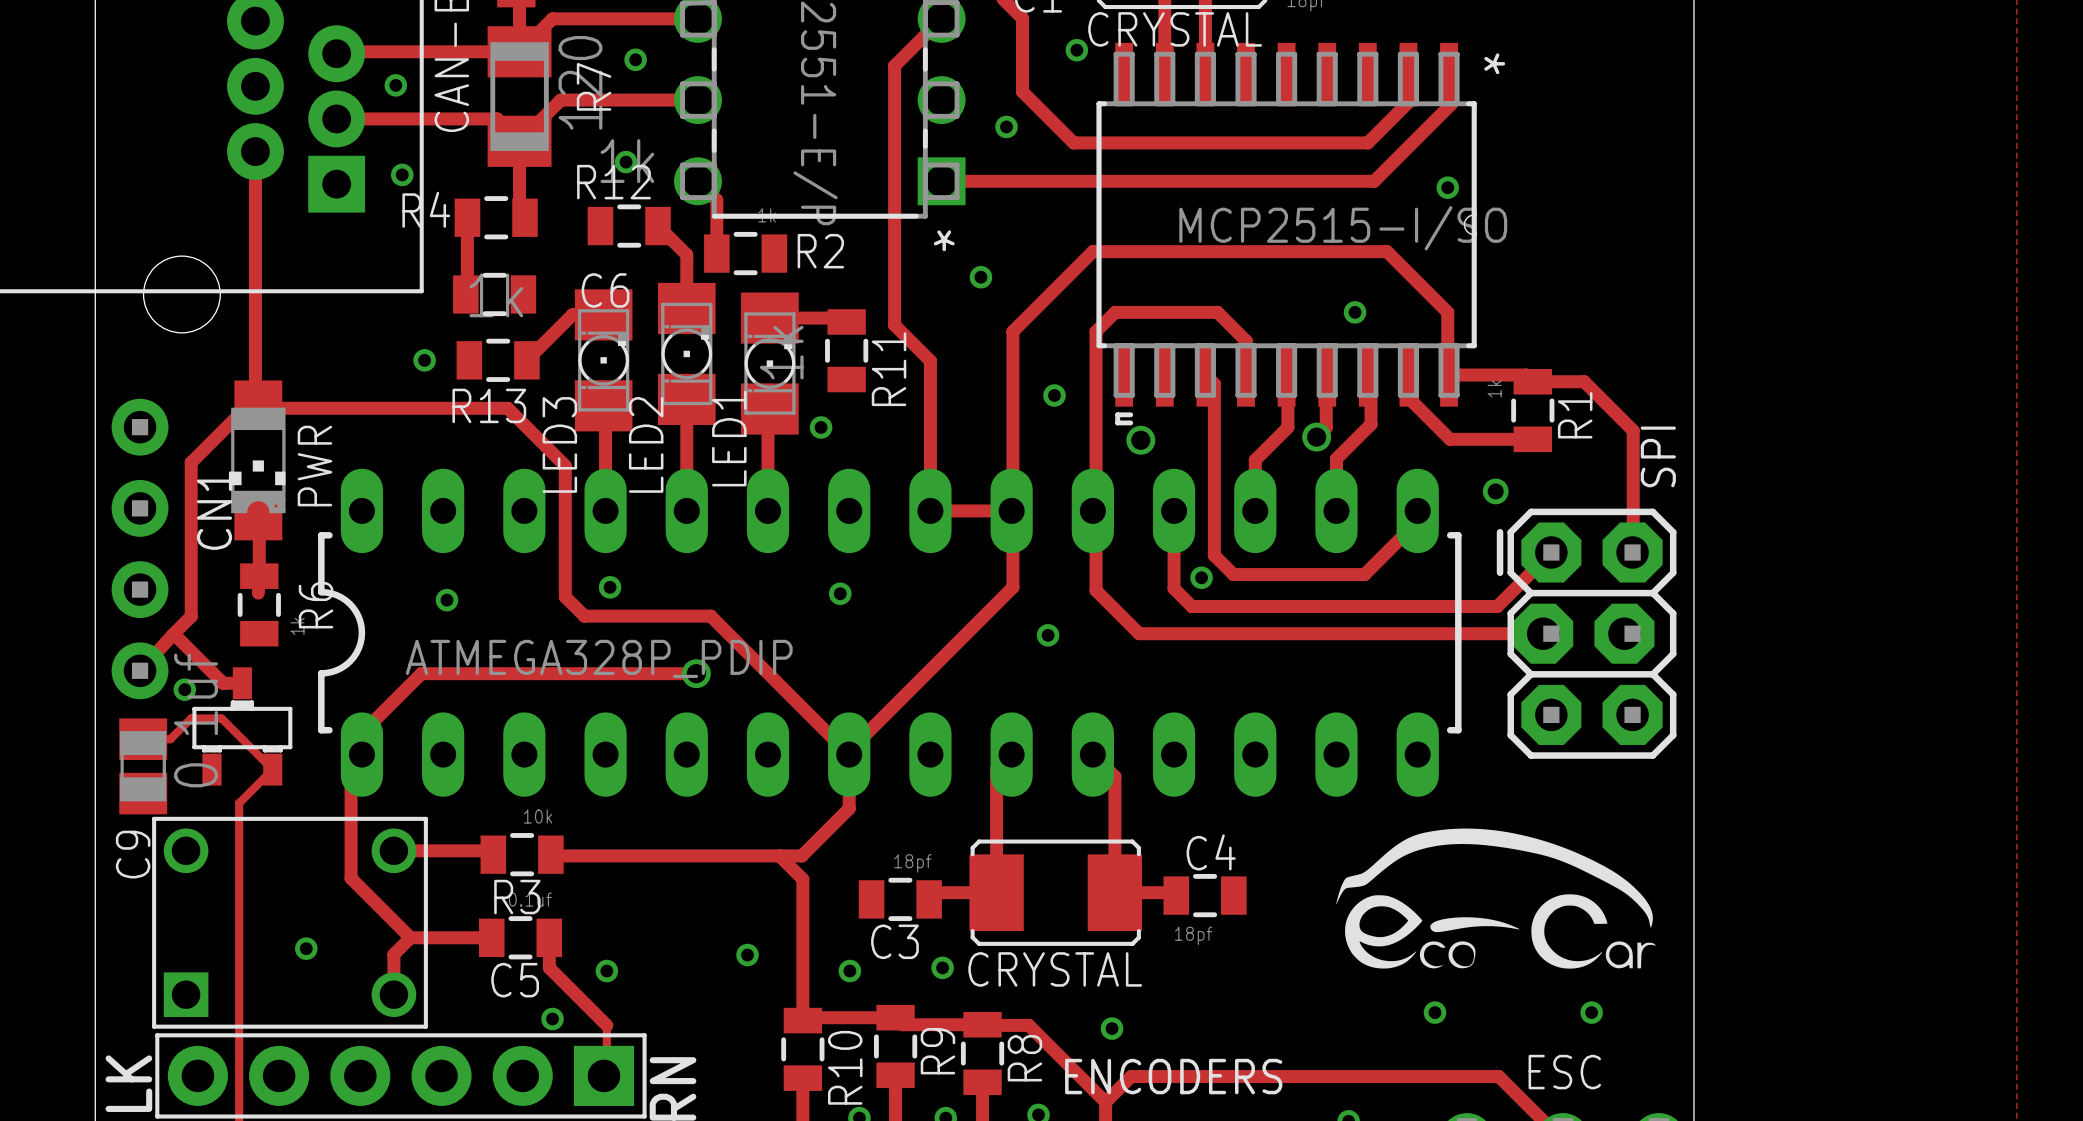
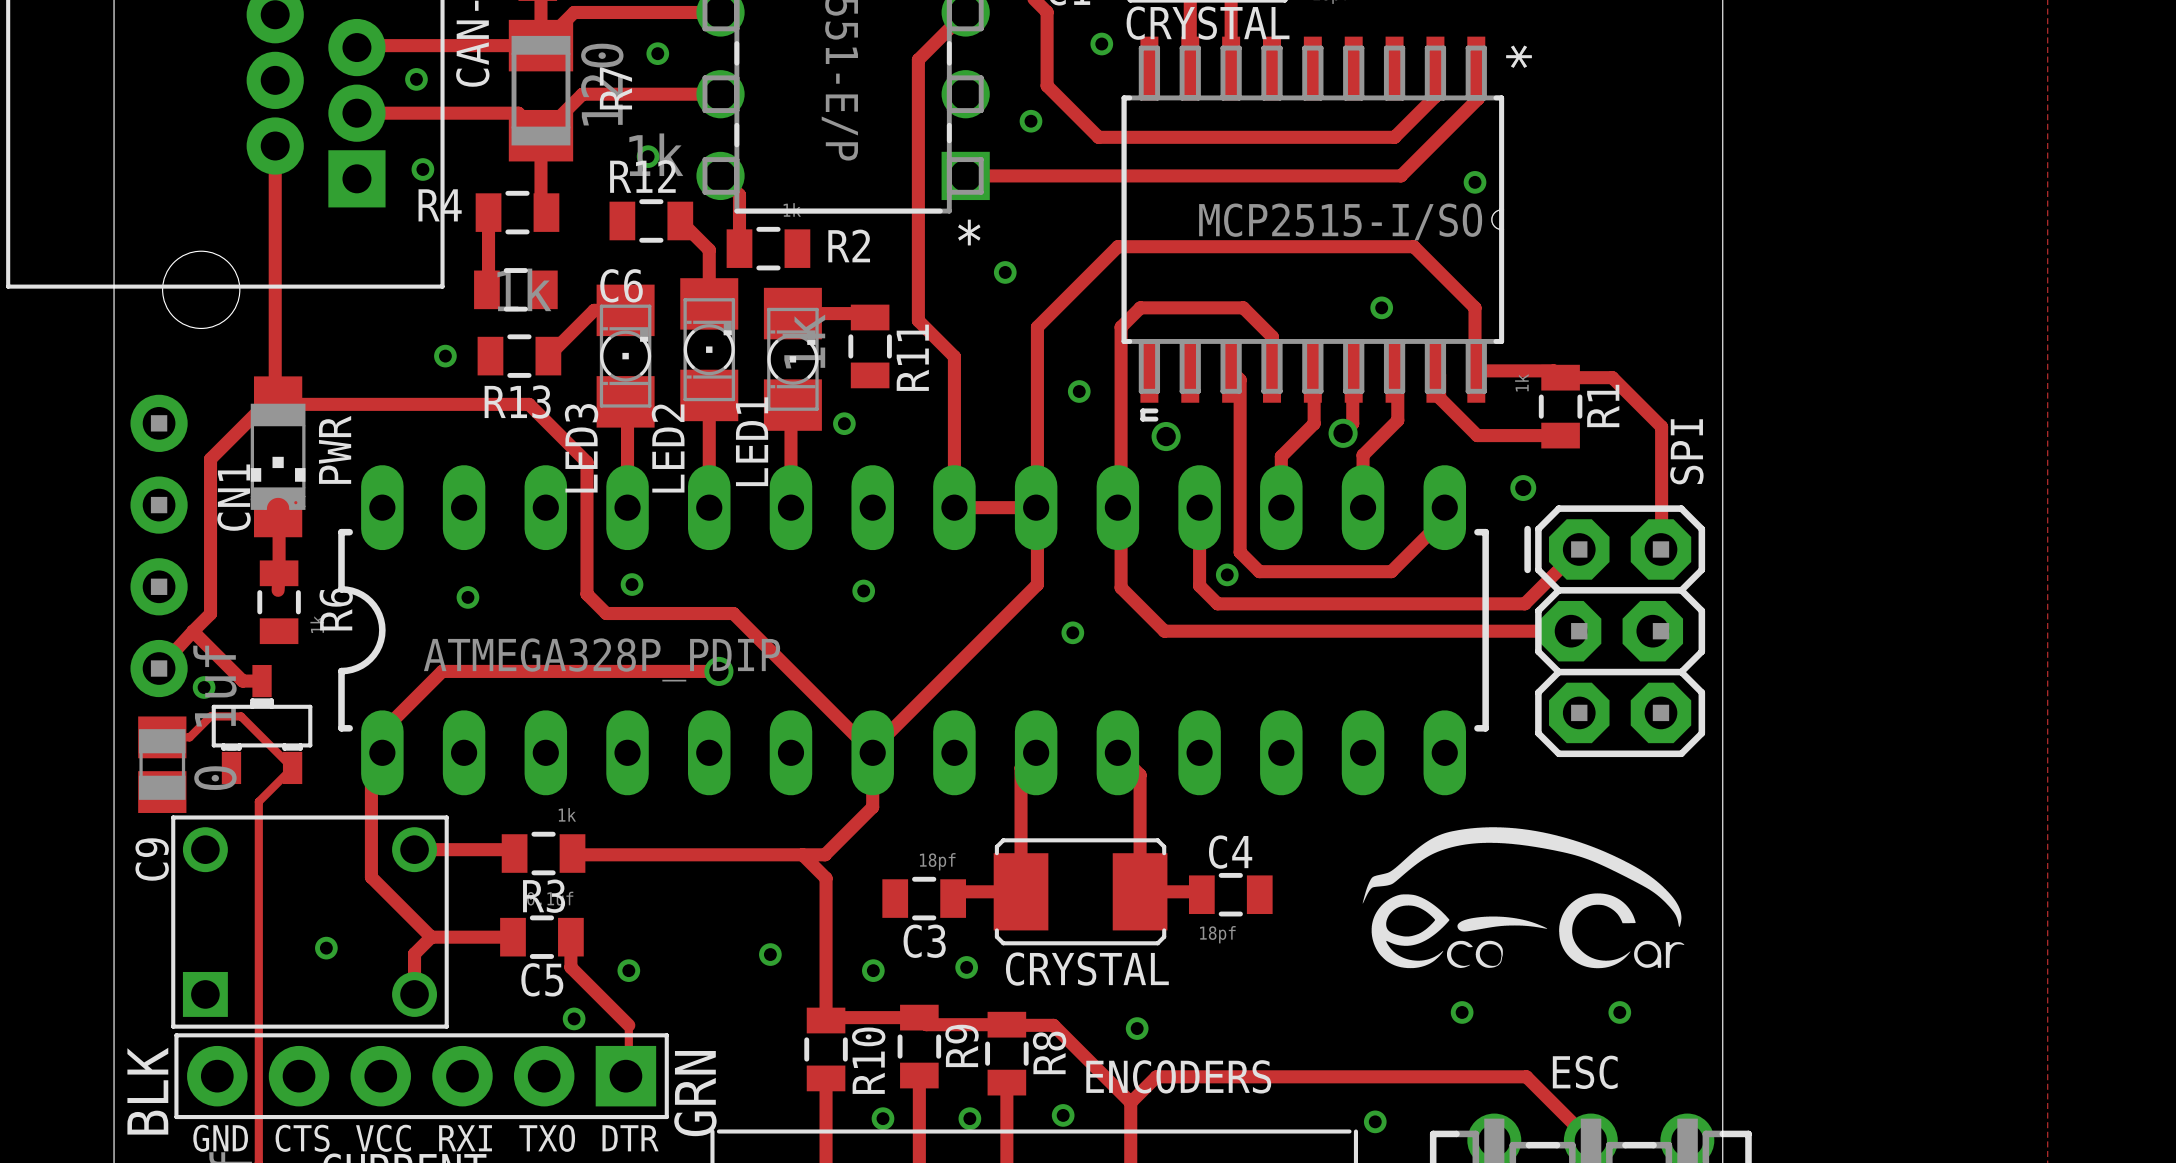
R3 value: 10k (538, 816) -> 1k (567, 814)

